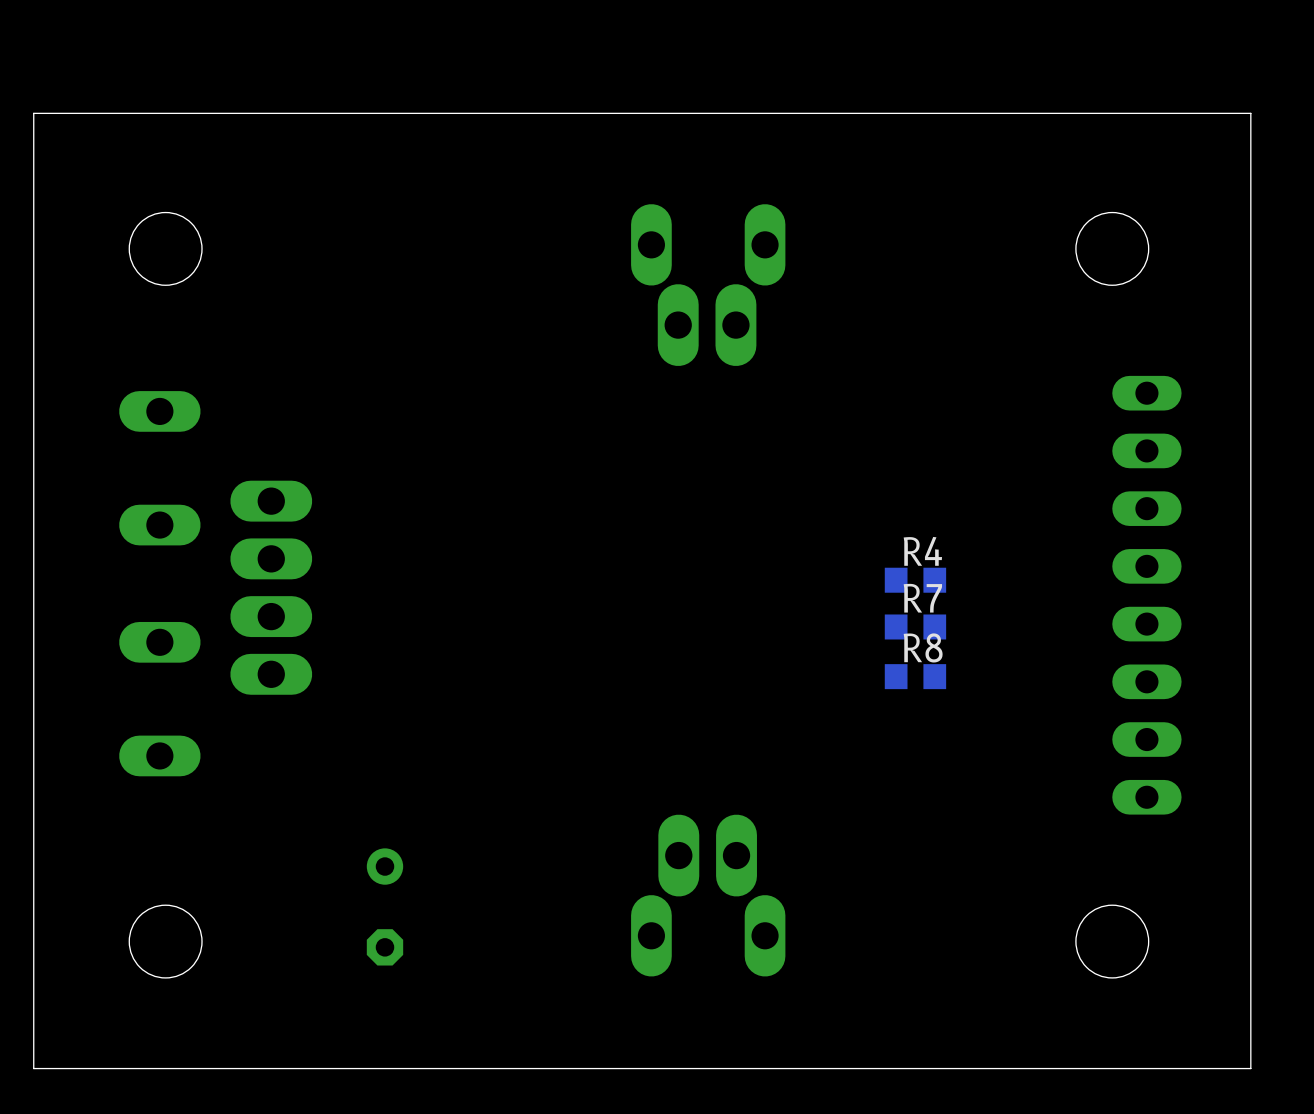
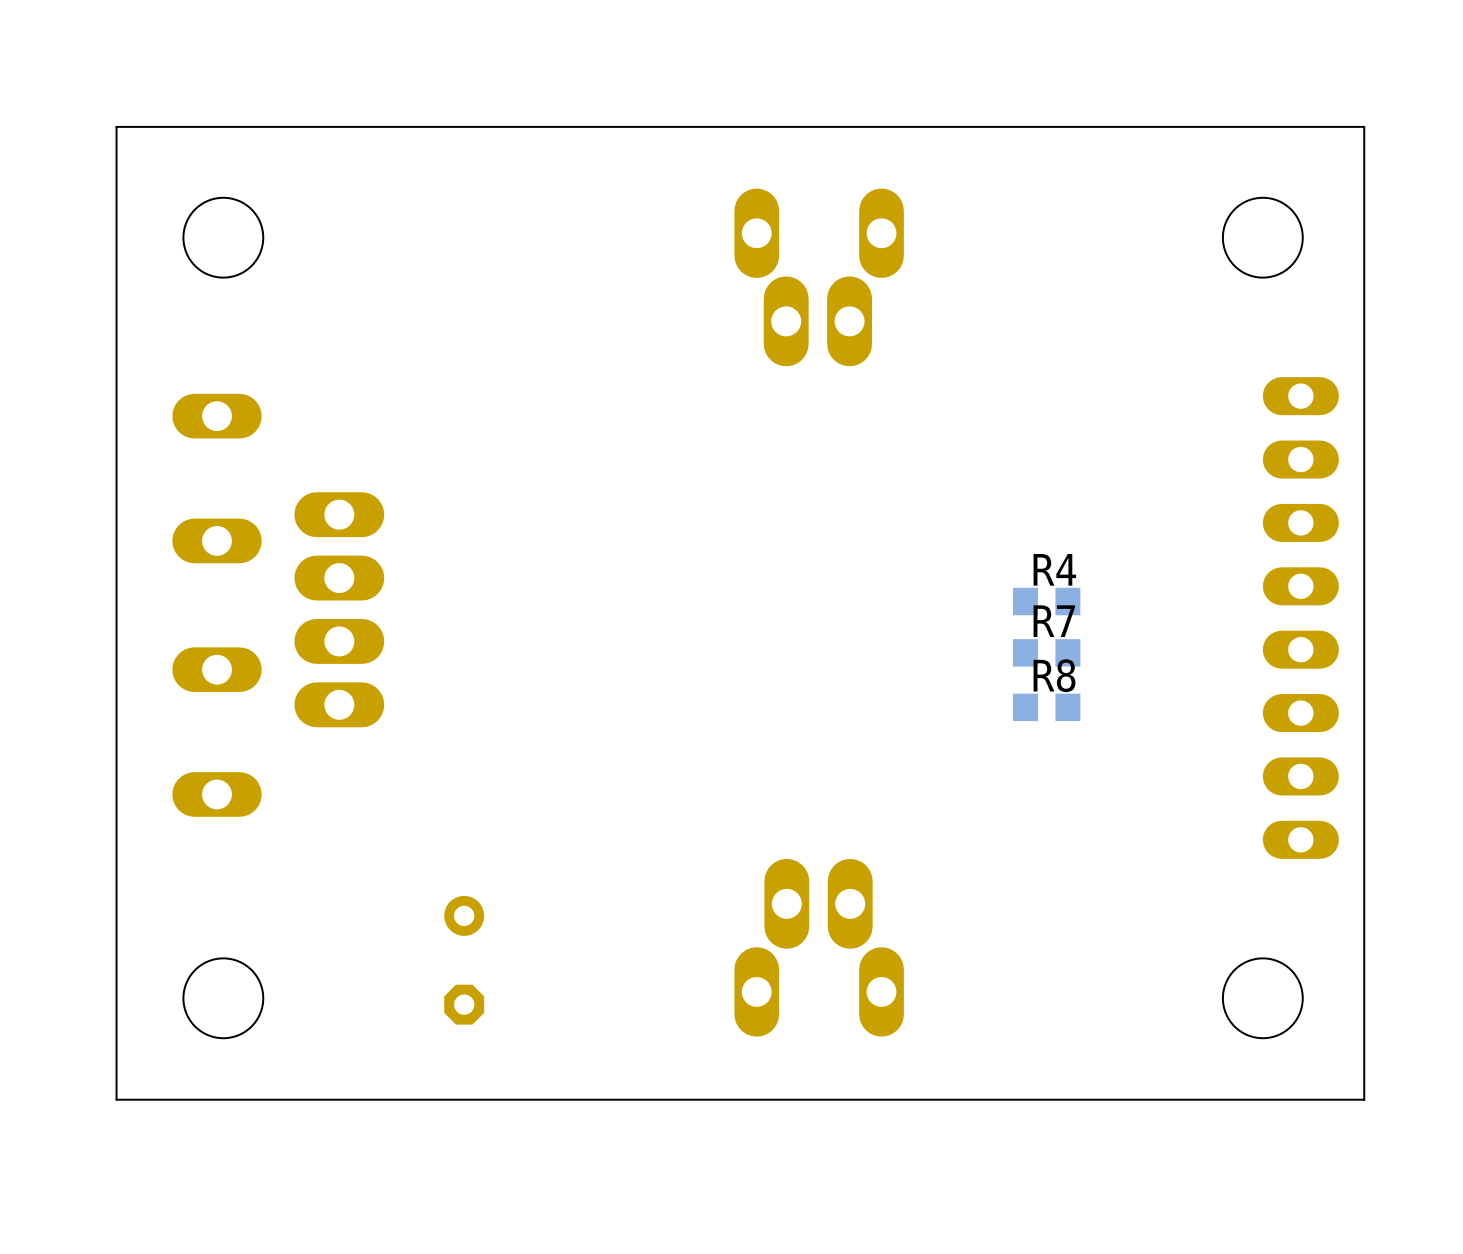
board edge: (1250, 113) (33, 113) (33, 1068) (1250, 1068) (1250, 113) -> (1364, 126) (1364, 1099) (116, 1099) (116, 126) (1364, 126)

